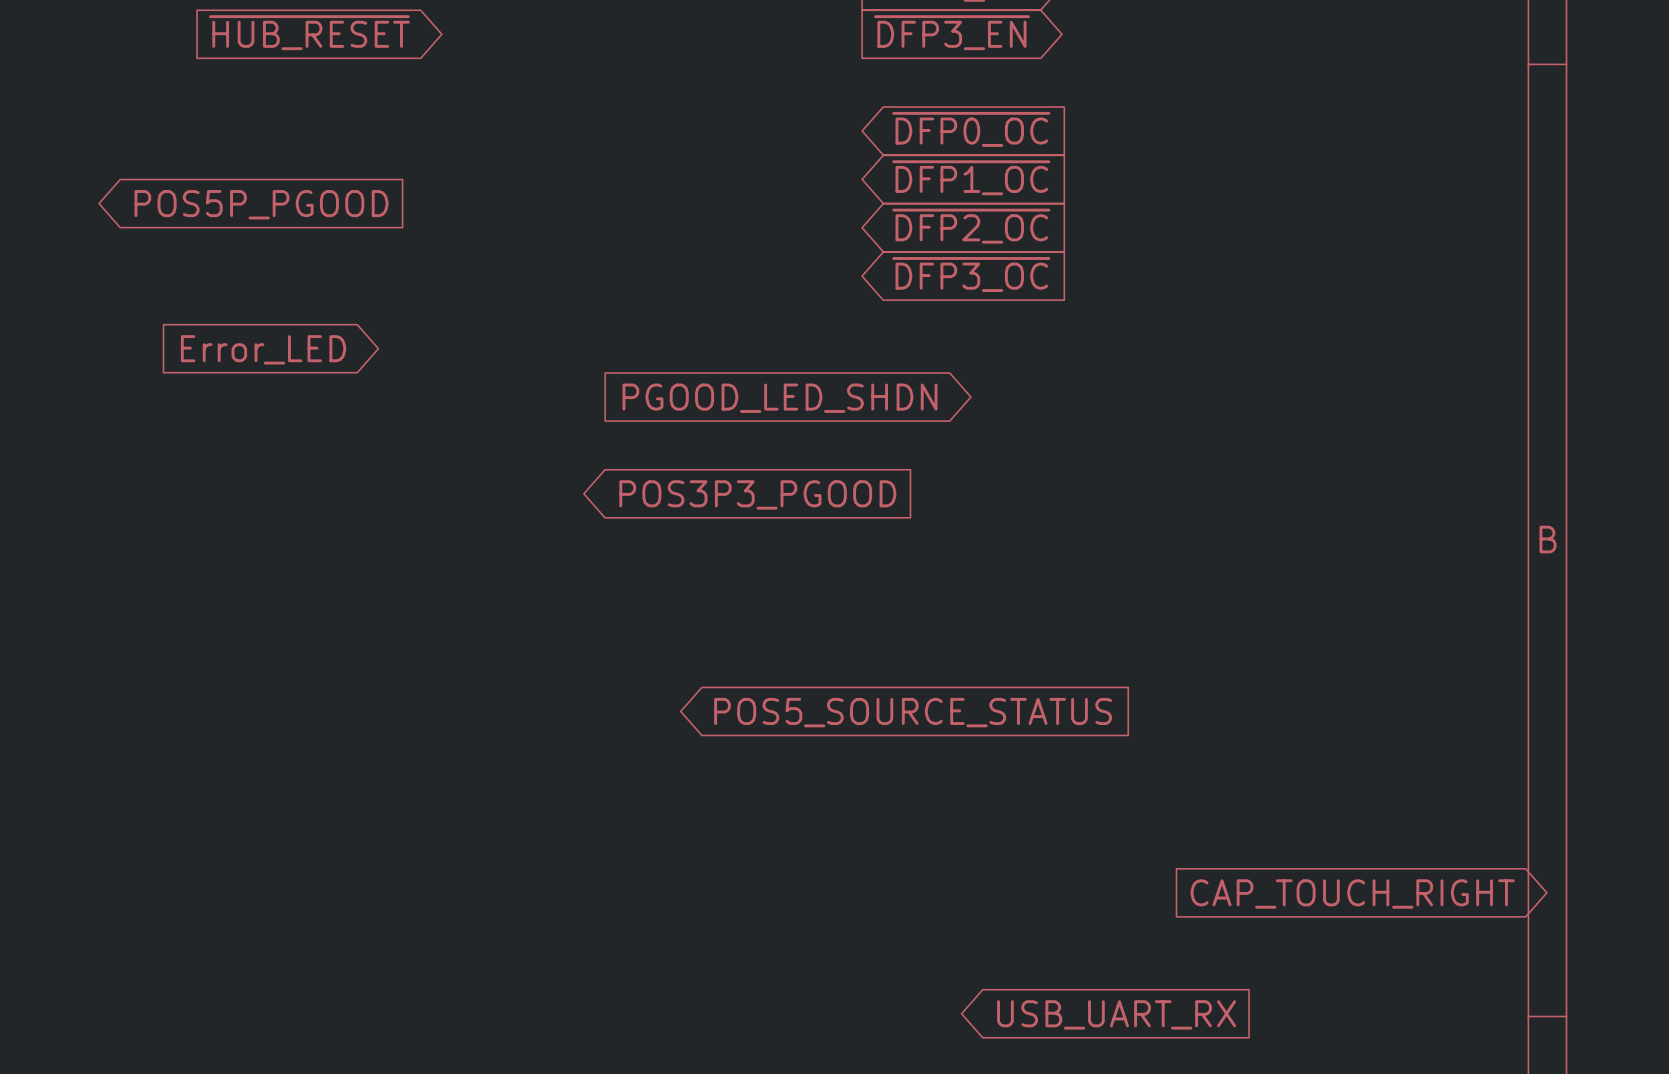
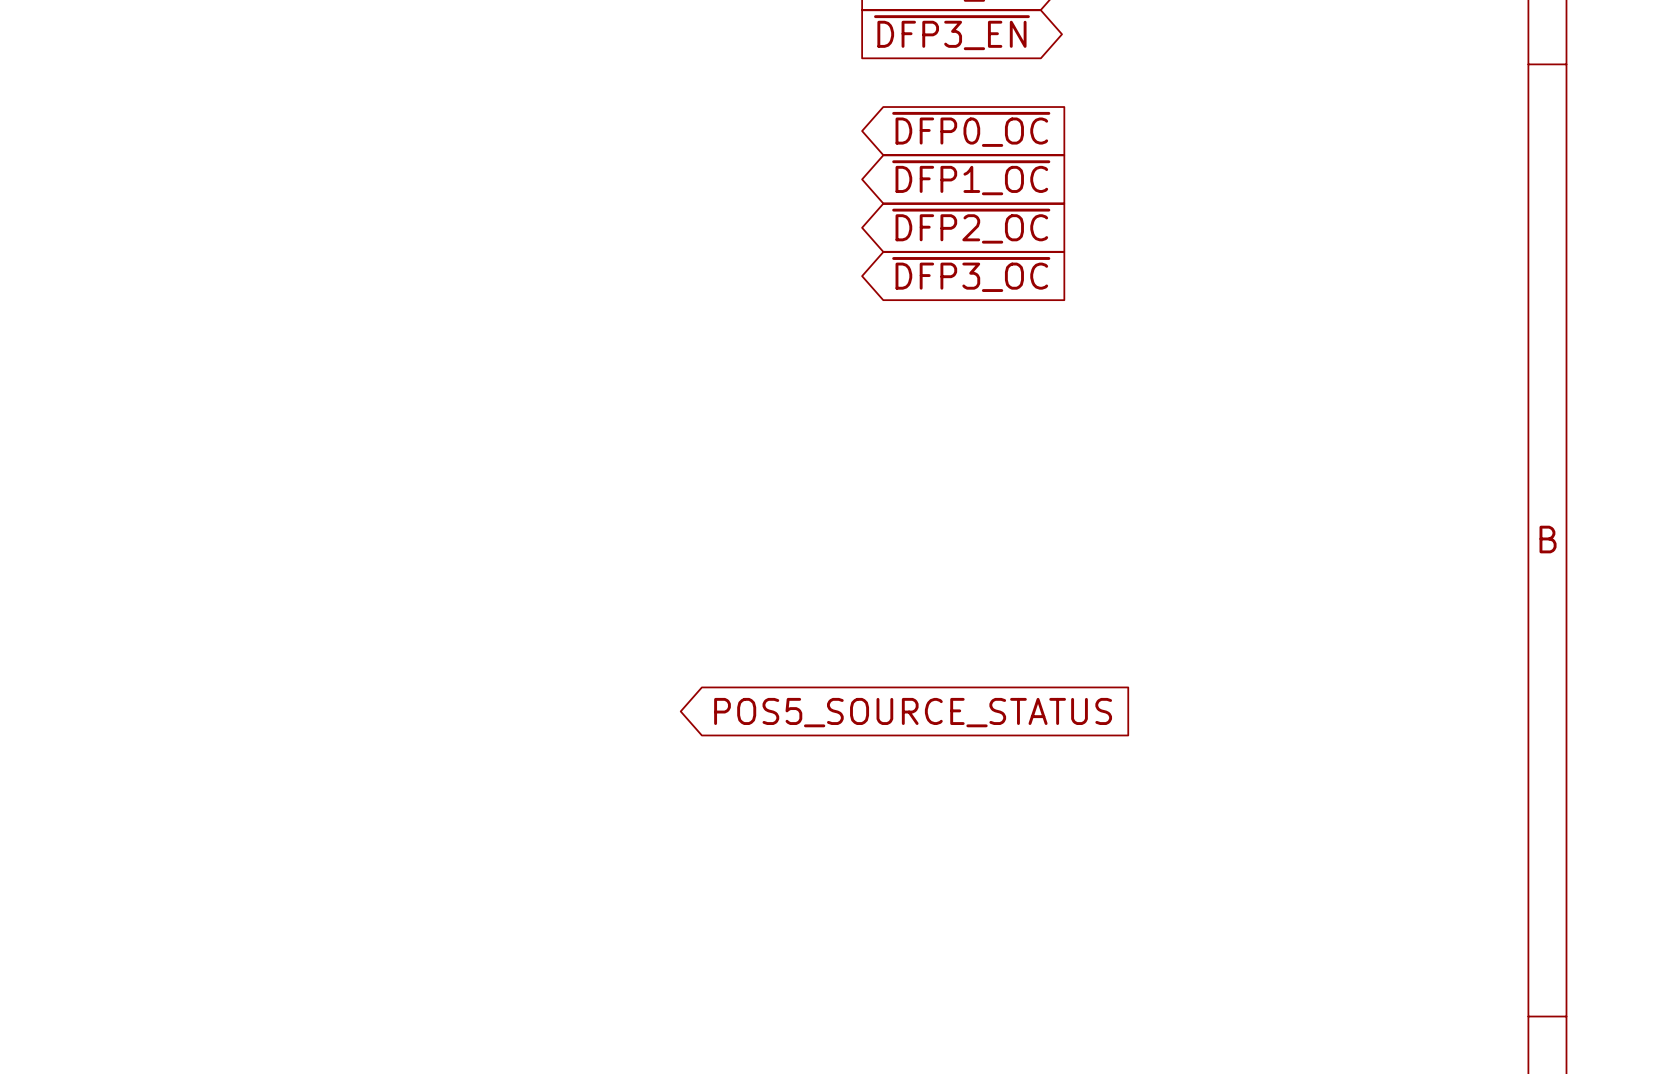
global label: ~{HUB_RESET} (309, 32) -> none
global label: POS5P_PGOOD (261, 204) -> none
global label: Error_LED (263, 349) -> none
global label: PGOOD_LED_SHDN (780, 398) -> none
global label: POS3P3_PGOOD (757, 494) -> none
global label: CAP_TOUCH_RIGHT (1352, 893) -> none
global label: USB_UART_RX (1116, 1014) -> none

